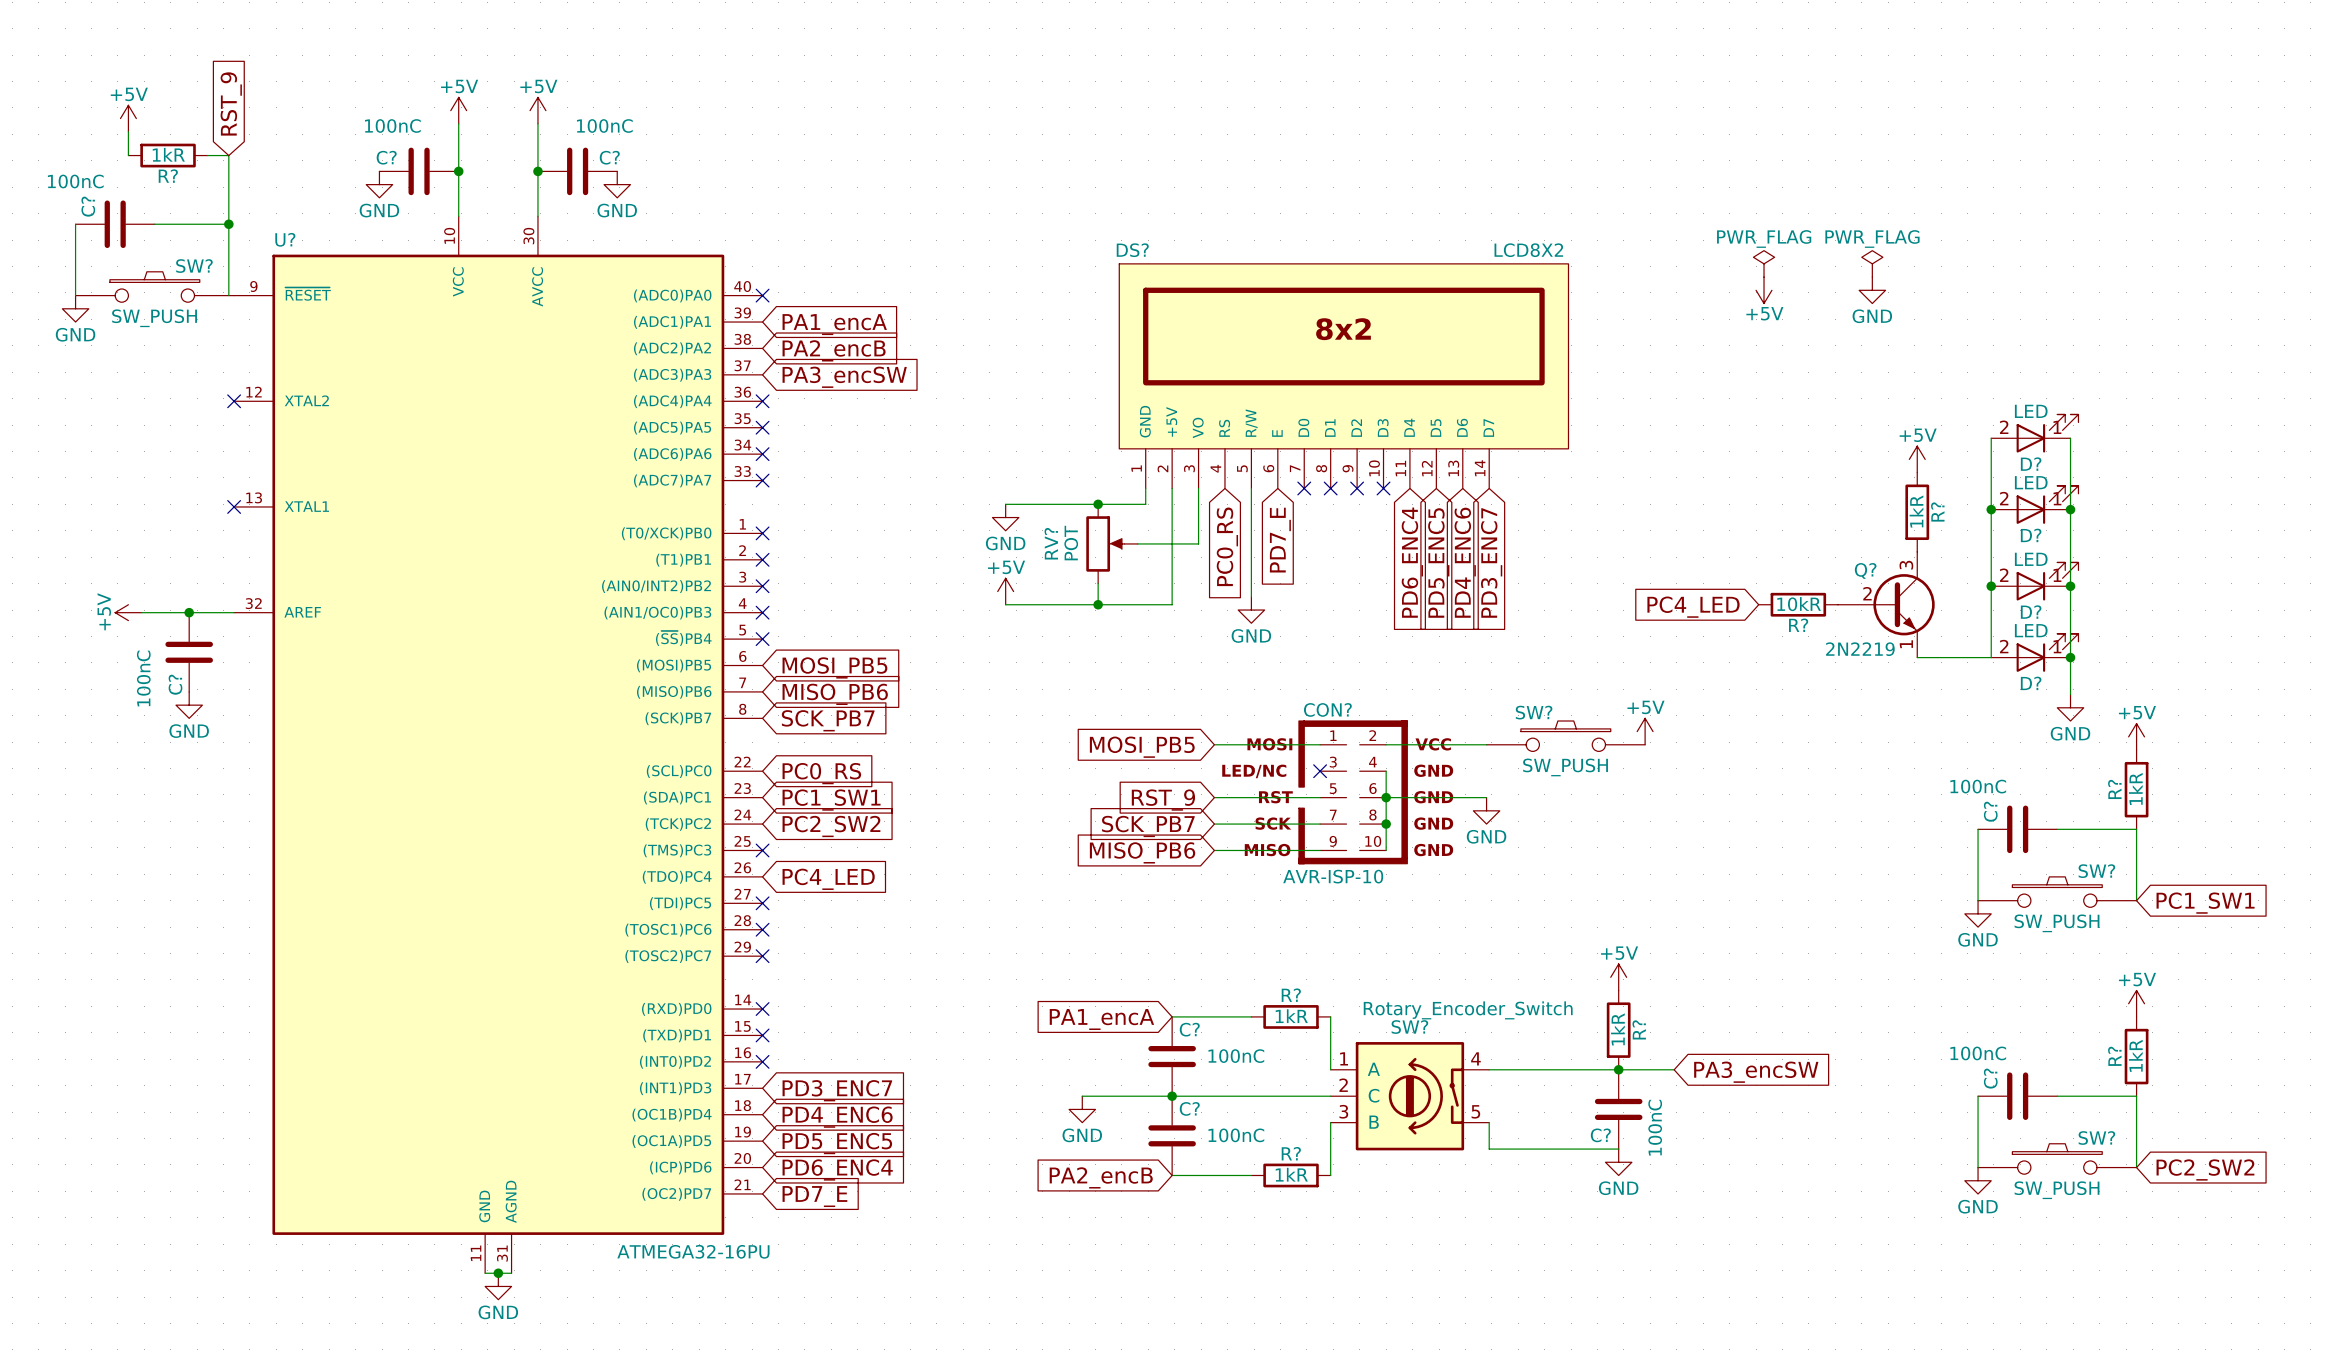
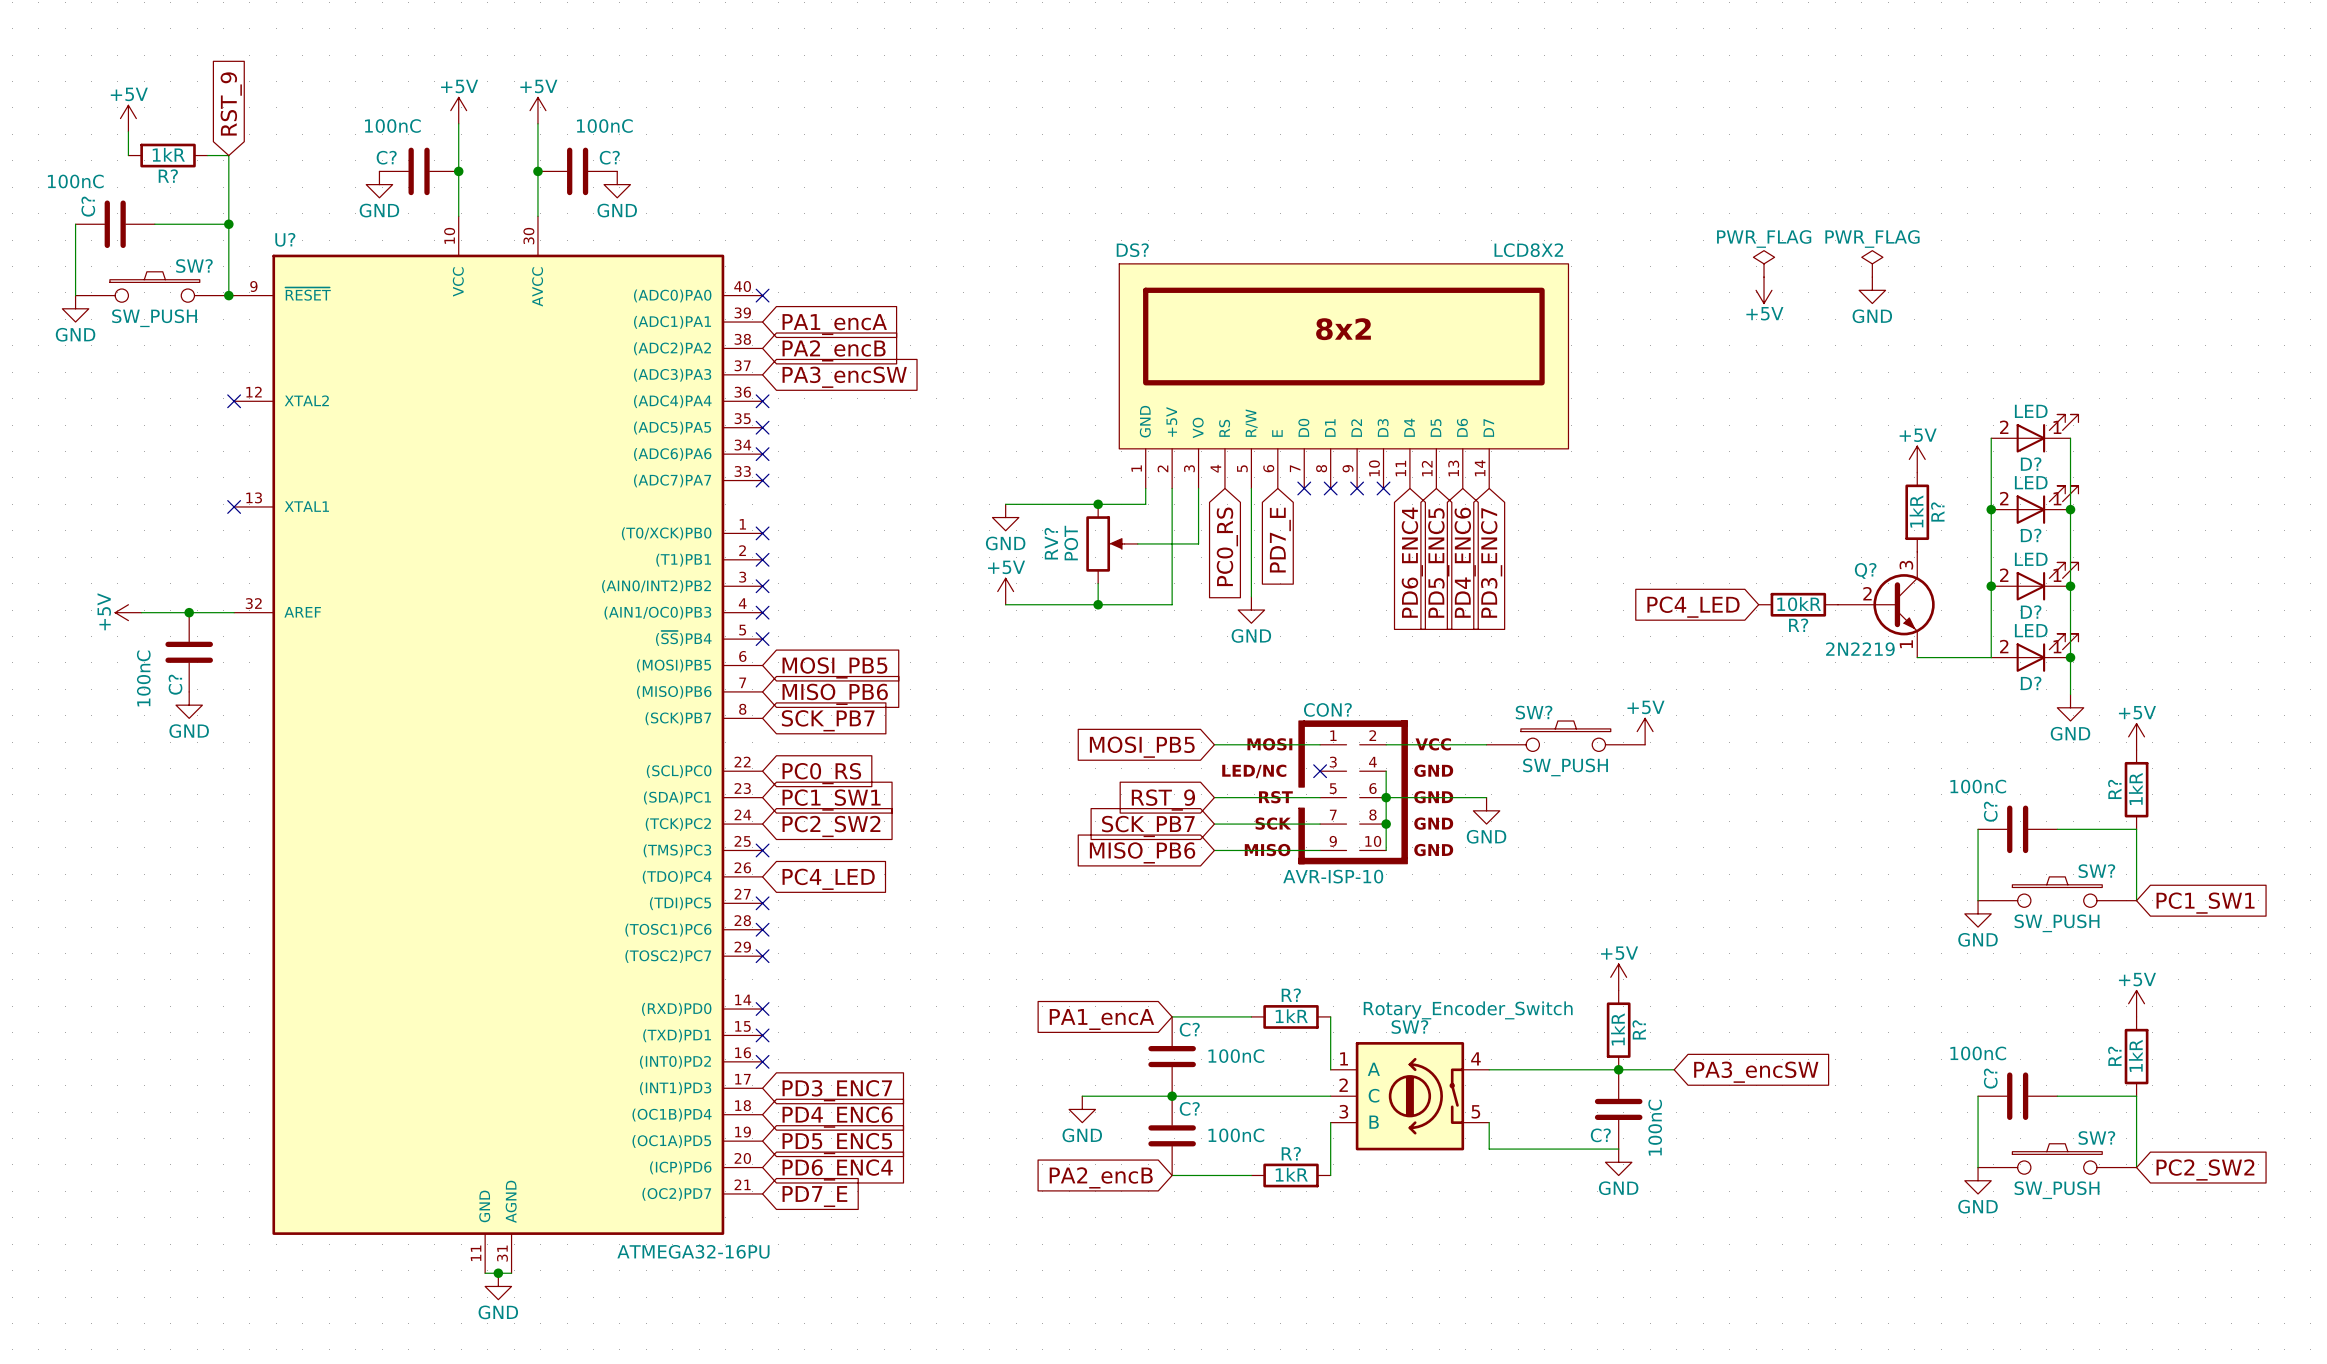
junction: none -> (228, 295)

